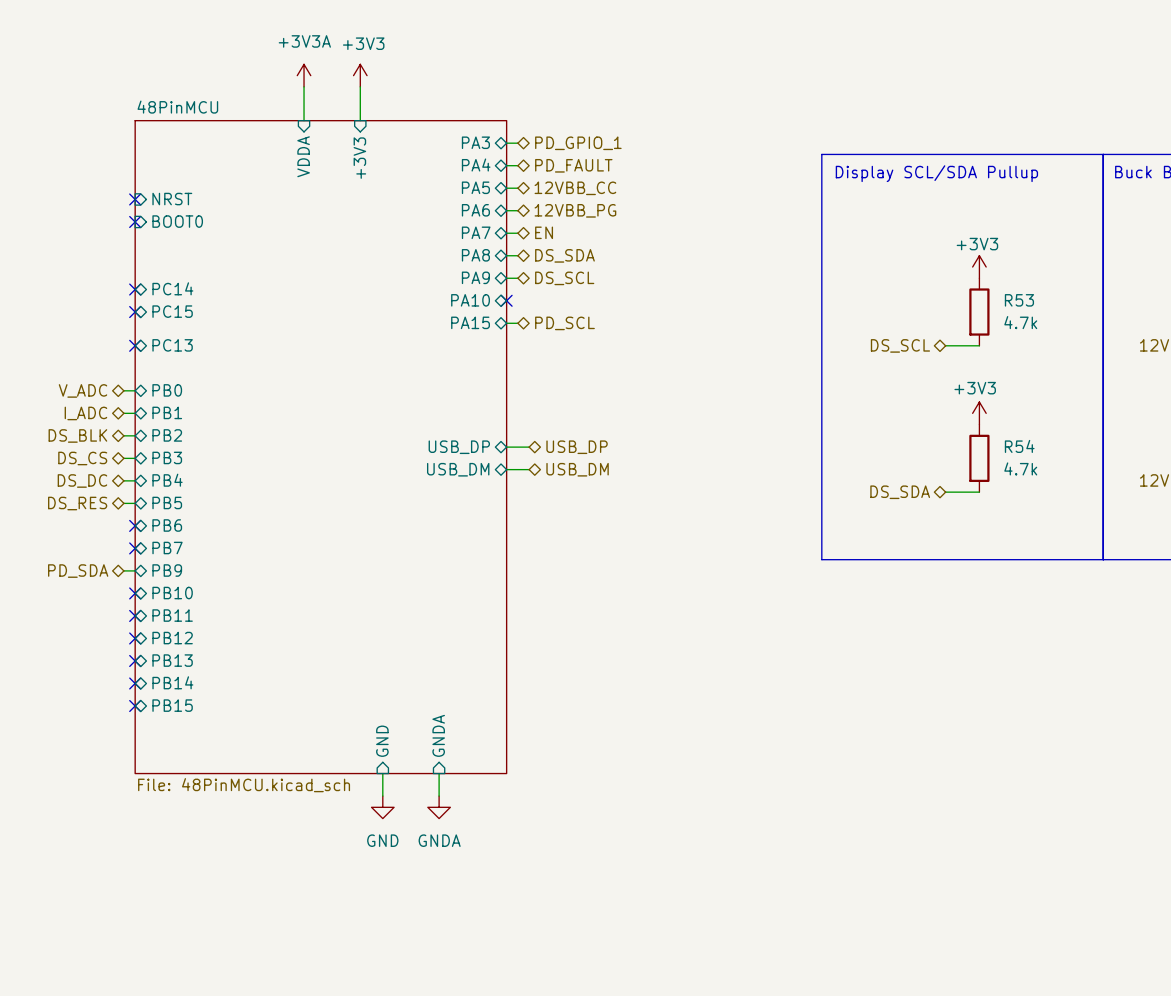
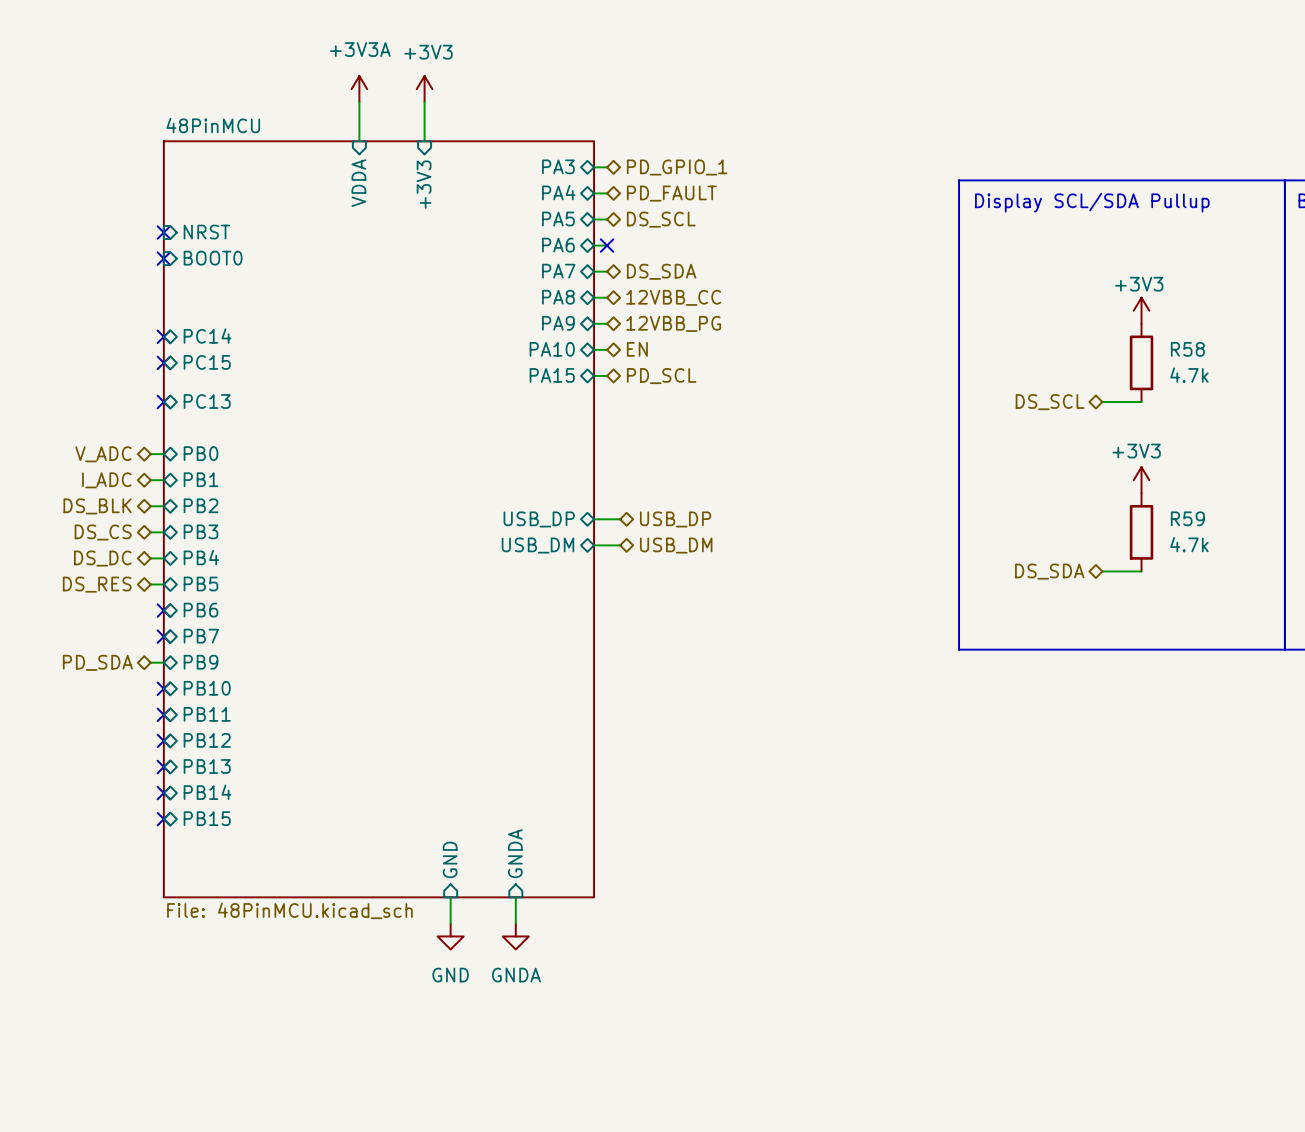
hierarchical label: 12VBB_CC (575, 188) -> DS_SCL (661, 219)
no-connect mark: none -> (607, 245)
hierarchical label: 12VBB_PG (575, 210) -> none
hierarchical label: EN (544, 232) -> DS_SDA (661, 271)
hierarchical label: DS_SDA (564, 255) -> 12VBB_CC (673, 297)
hierarchical label: DS_SCL (564, 278) -> 12VBB_PG (673, 323)
wire: none -> (594, 349) (607, 349)
no-connect mark: (506, 300) -> none
hierarchical label: none -> EN (637, 349)
R53 name: R53 (1019, 300) -> R58 (1187, 349)
R54 name: R54 (1019, 446) -> R59 (1187, 518)

